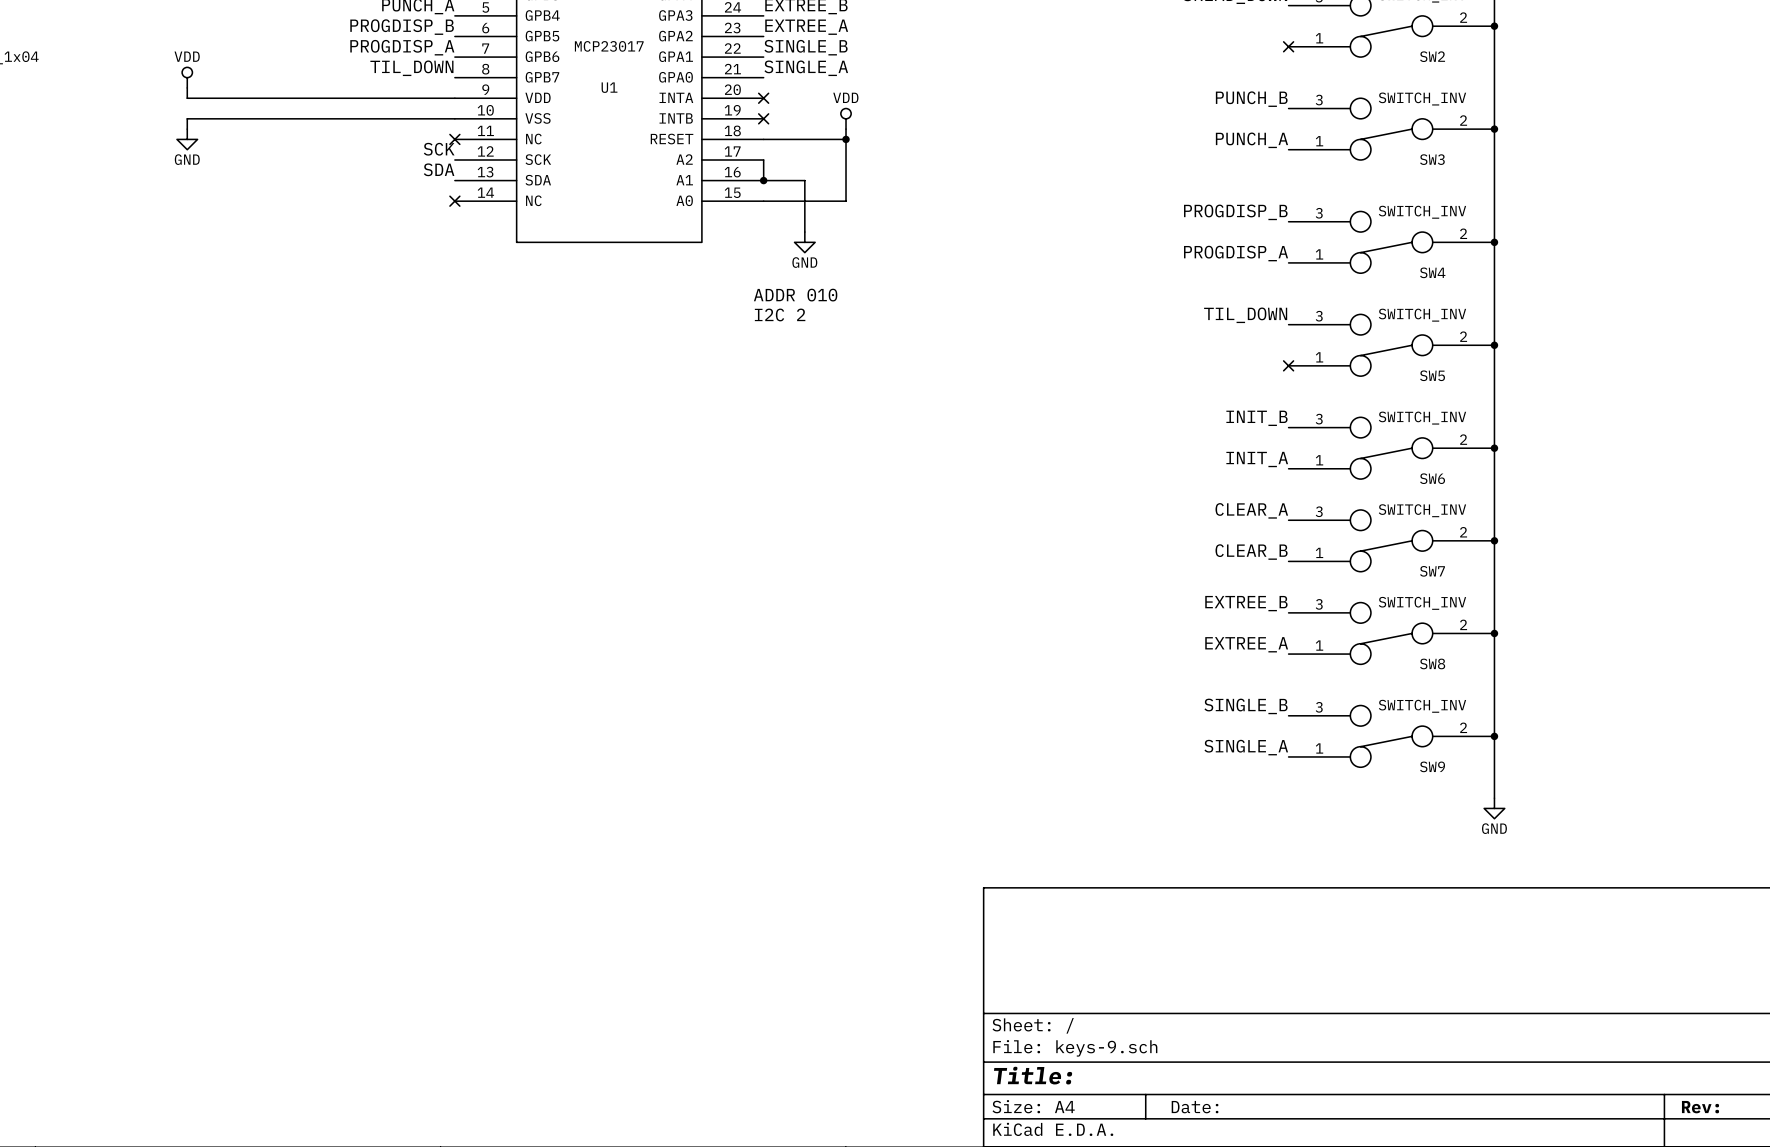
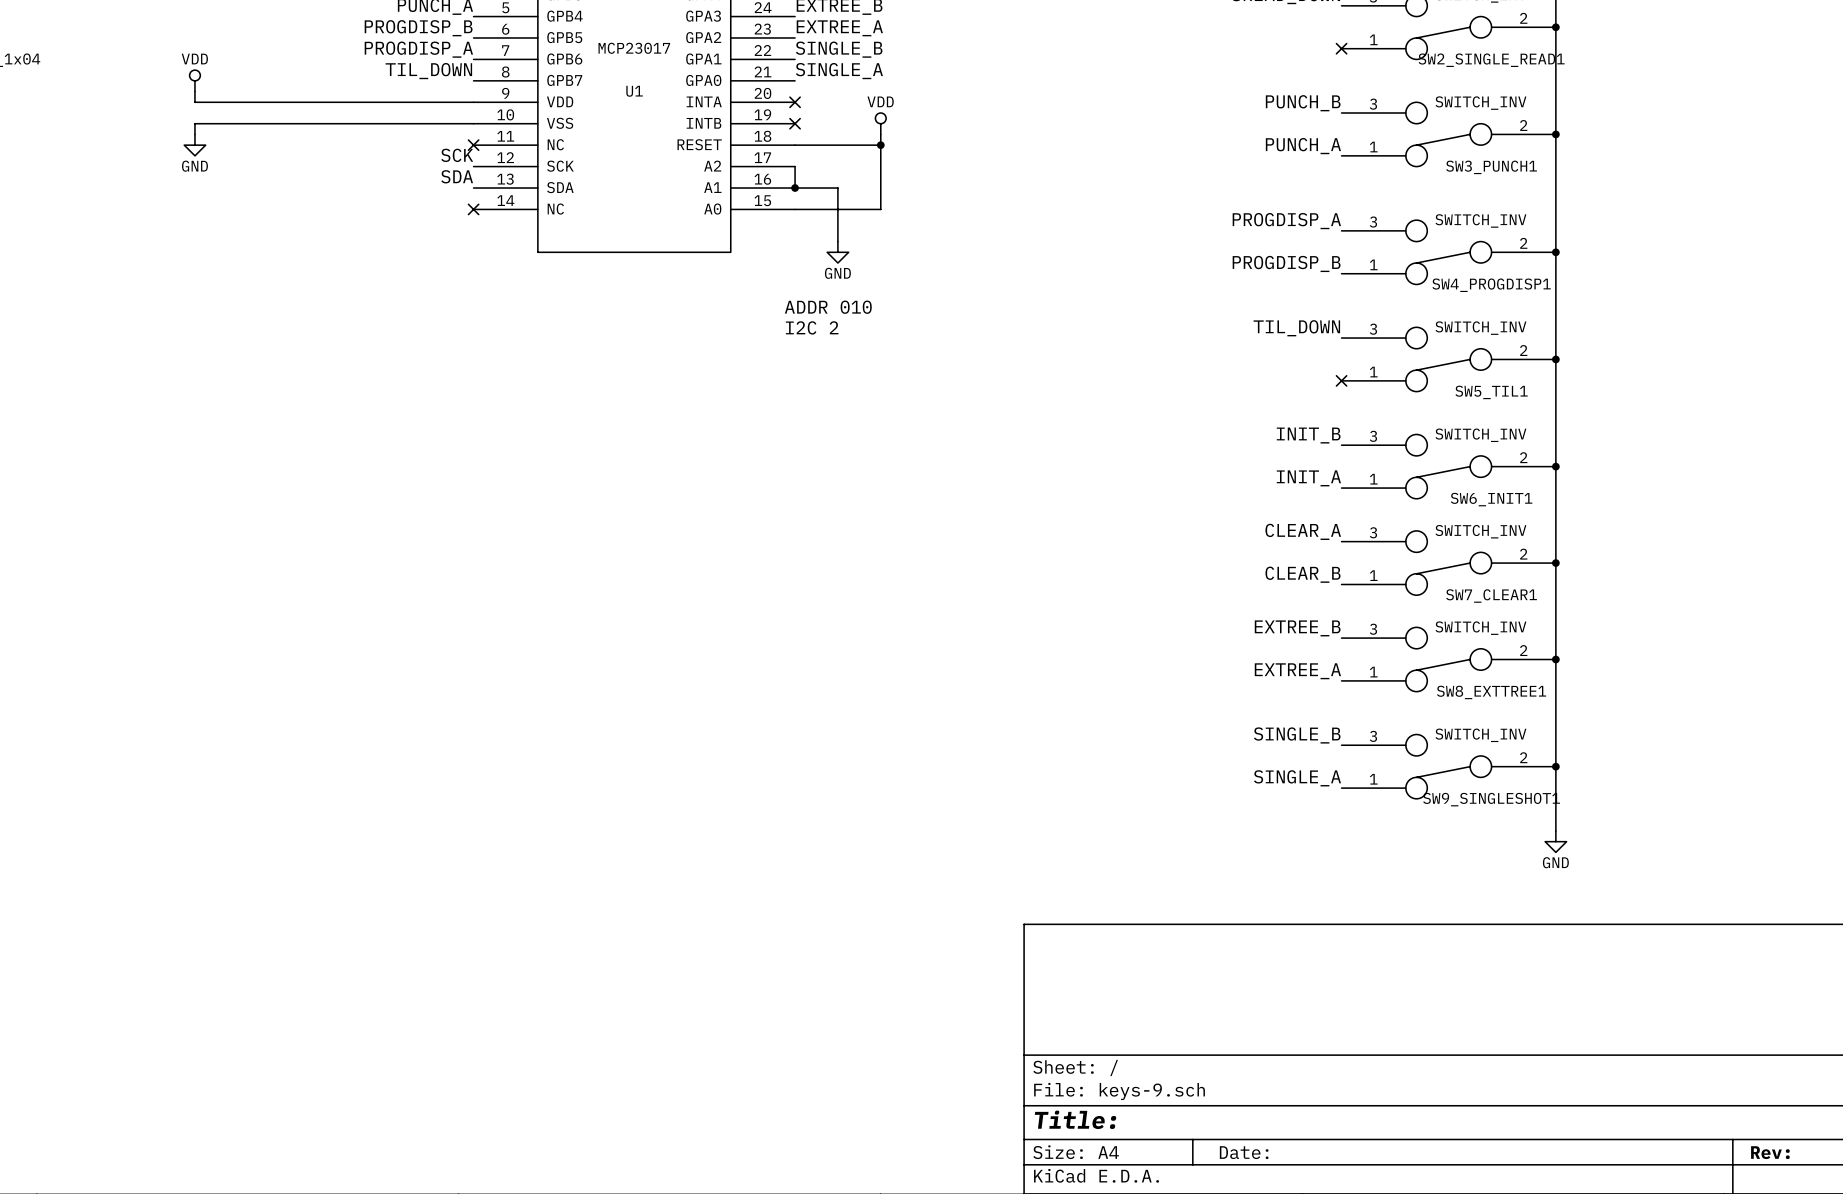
SW2 name: SW2 (1432, 56) -> SW2_SINGLE_READ1 (1491, 60)
SW3 name: SW3 (1432, 159) -> SW3_PUNCH1 (1491, 167)
label: PROGDISP_B (1235, 212) -> PROGDISP_A (1286, 221)
label: PROGDISP_A (1236, 253) -> PROGDISP_B (1286, 263)
SW4 name: SW4 (1432, 272) -> SW4_PROGDISP1 (1491, 285)
SW5 name: SW5 (1432, 375) -> SW5_TIL1 (1491, 392)
SW6 name: SW6 (1432, 478) -> SW6_INIT1 (1491, 499)
SW7 name: SW7 (1432, 571) -> SW7_CLEAR1 (1491, 596)
SW8 name: SW8 (1432, 663) -> SW8_EXTTREE1 (1491, 692)
SW9 name: SW9 (1432, 766) -> SW9_SINGLESHOT1 (1491, 799)

